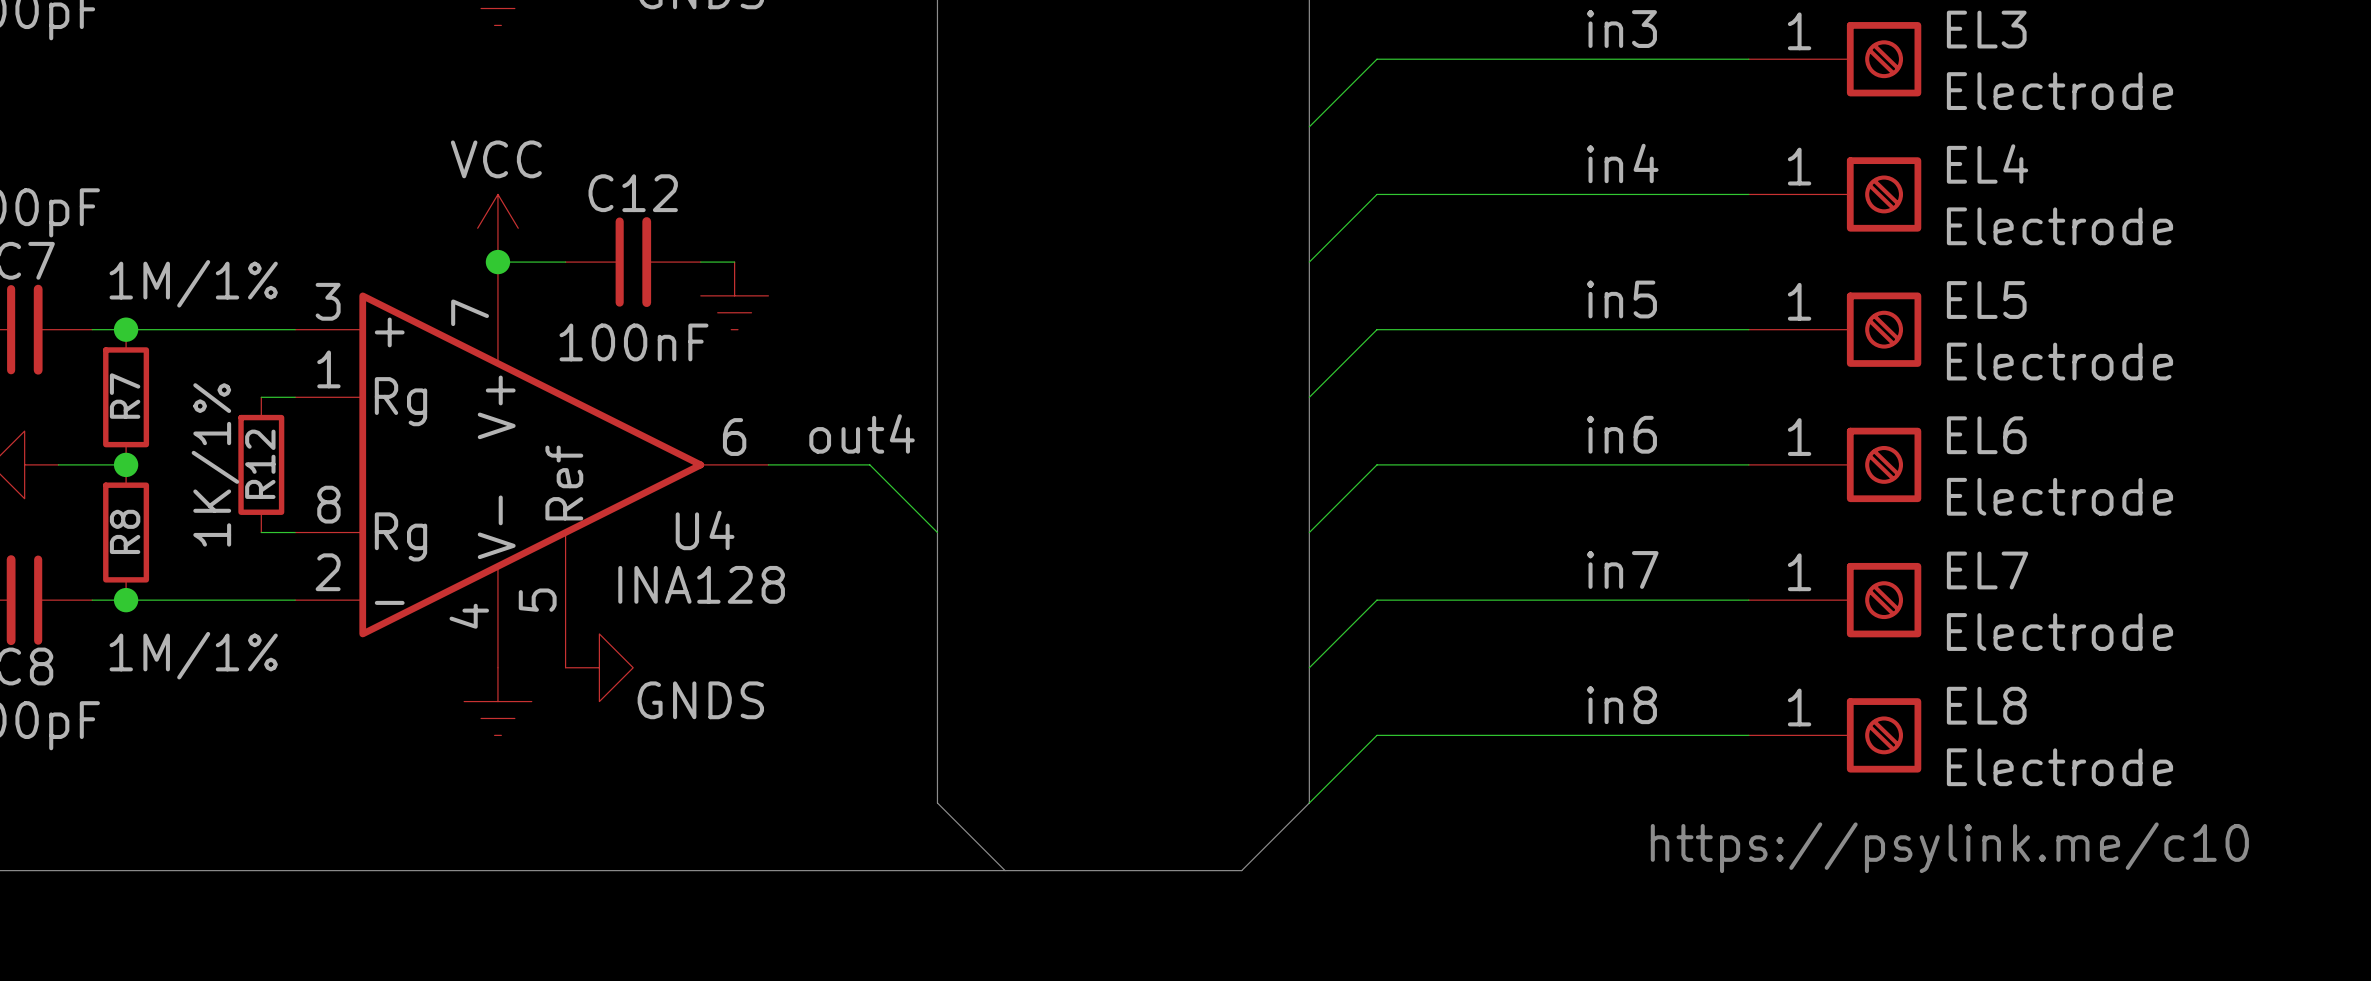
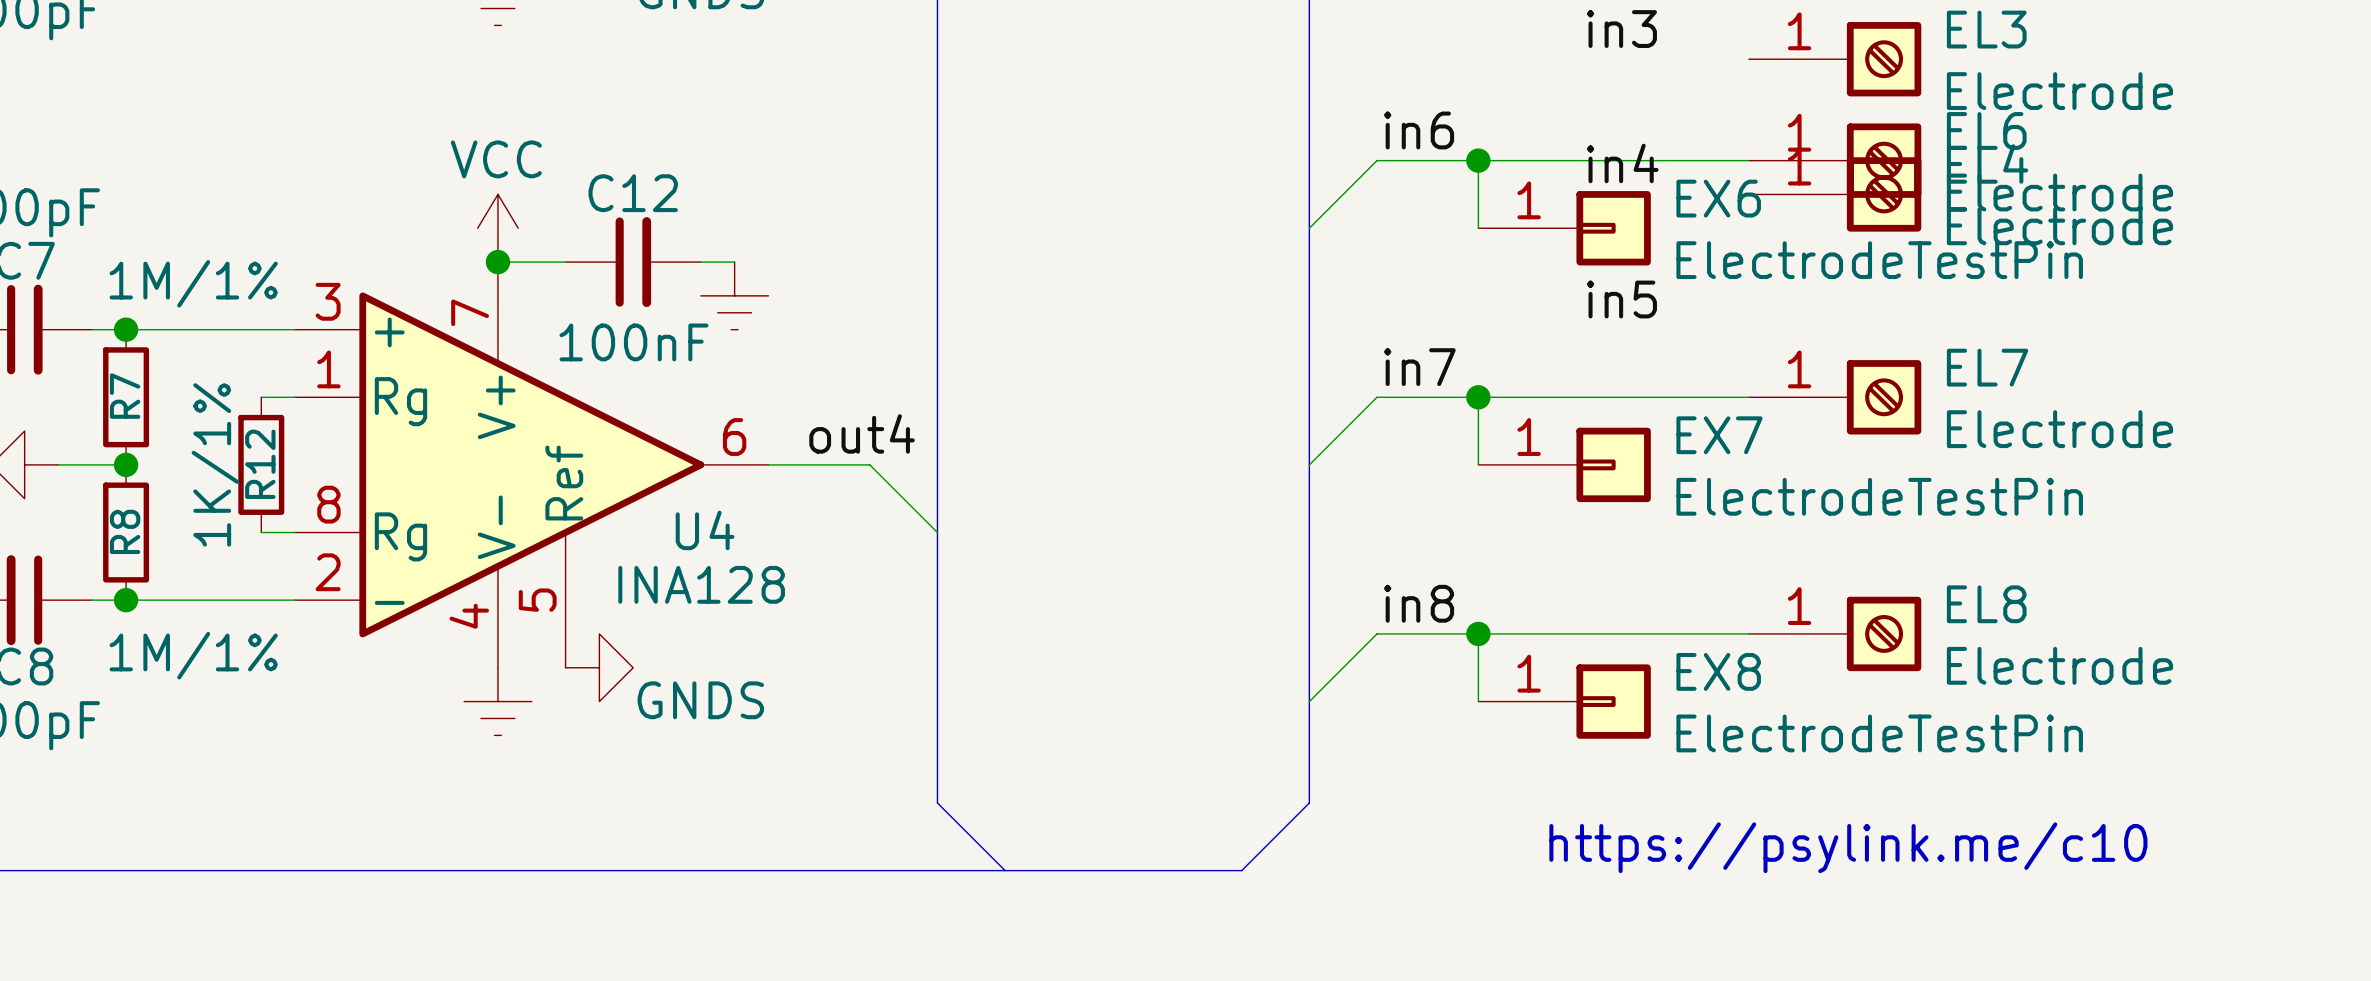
wire: (1748, 59) (1376, 59) (1309, 126) -> none
wire: none -> (1478, 160) (1478, 228)
junction: none -> (1478, 160)
wire: (1748, 194) (1376, 194) (1309, 262) -> (1748, 160) (1376, 160) (1309, 228)
EX6: none -> ElectrodeTestPin (1564, 228)
wire: (1748, 329) (1376, 329) (1309, 397) -> (1748, 397) (1376, 397) (1309, 464)
EL5: Electrode (1835, 329) -> none
wire: none -> (1478, 397) (1478, 464)
junction: none -> (1478, 397)
label position: in6 (1621, 434) -> in6 (1419, 130)
EX7: none -> ElectrodeTestPin (1564, 464)
wire: (1748, 464) (1376, 464) (1309, 532) -> none
EL6 position: (1835, 464) -> (1835, 160)
label position: in7 (1622, 569) -> in7 (1419, 367)
wire: (1748, 600) (1376, 600) (1309, 667) -> none
EL7 position: (1835, 600) -> (1835, 397)
wire: none -> (1478, 633) (1478, 701)
junction: none -> (1478, 633)
EX8: none -> ElectrodeTestPin (1564, 701)
label position: in8 (1621, 705) -> in8 (1419, 603)
wire: (1748, 735) (1376, 735) (1309, 802) -> (1748, 633) (1376, 633) (1309, 701)
EL8 position: (1835, 735) -> (1835, 633)
text position: https://psylink.me/c10 (1949, 847) -> https://psylink.me/c10 (1848, 847)

